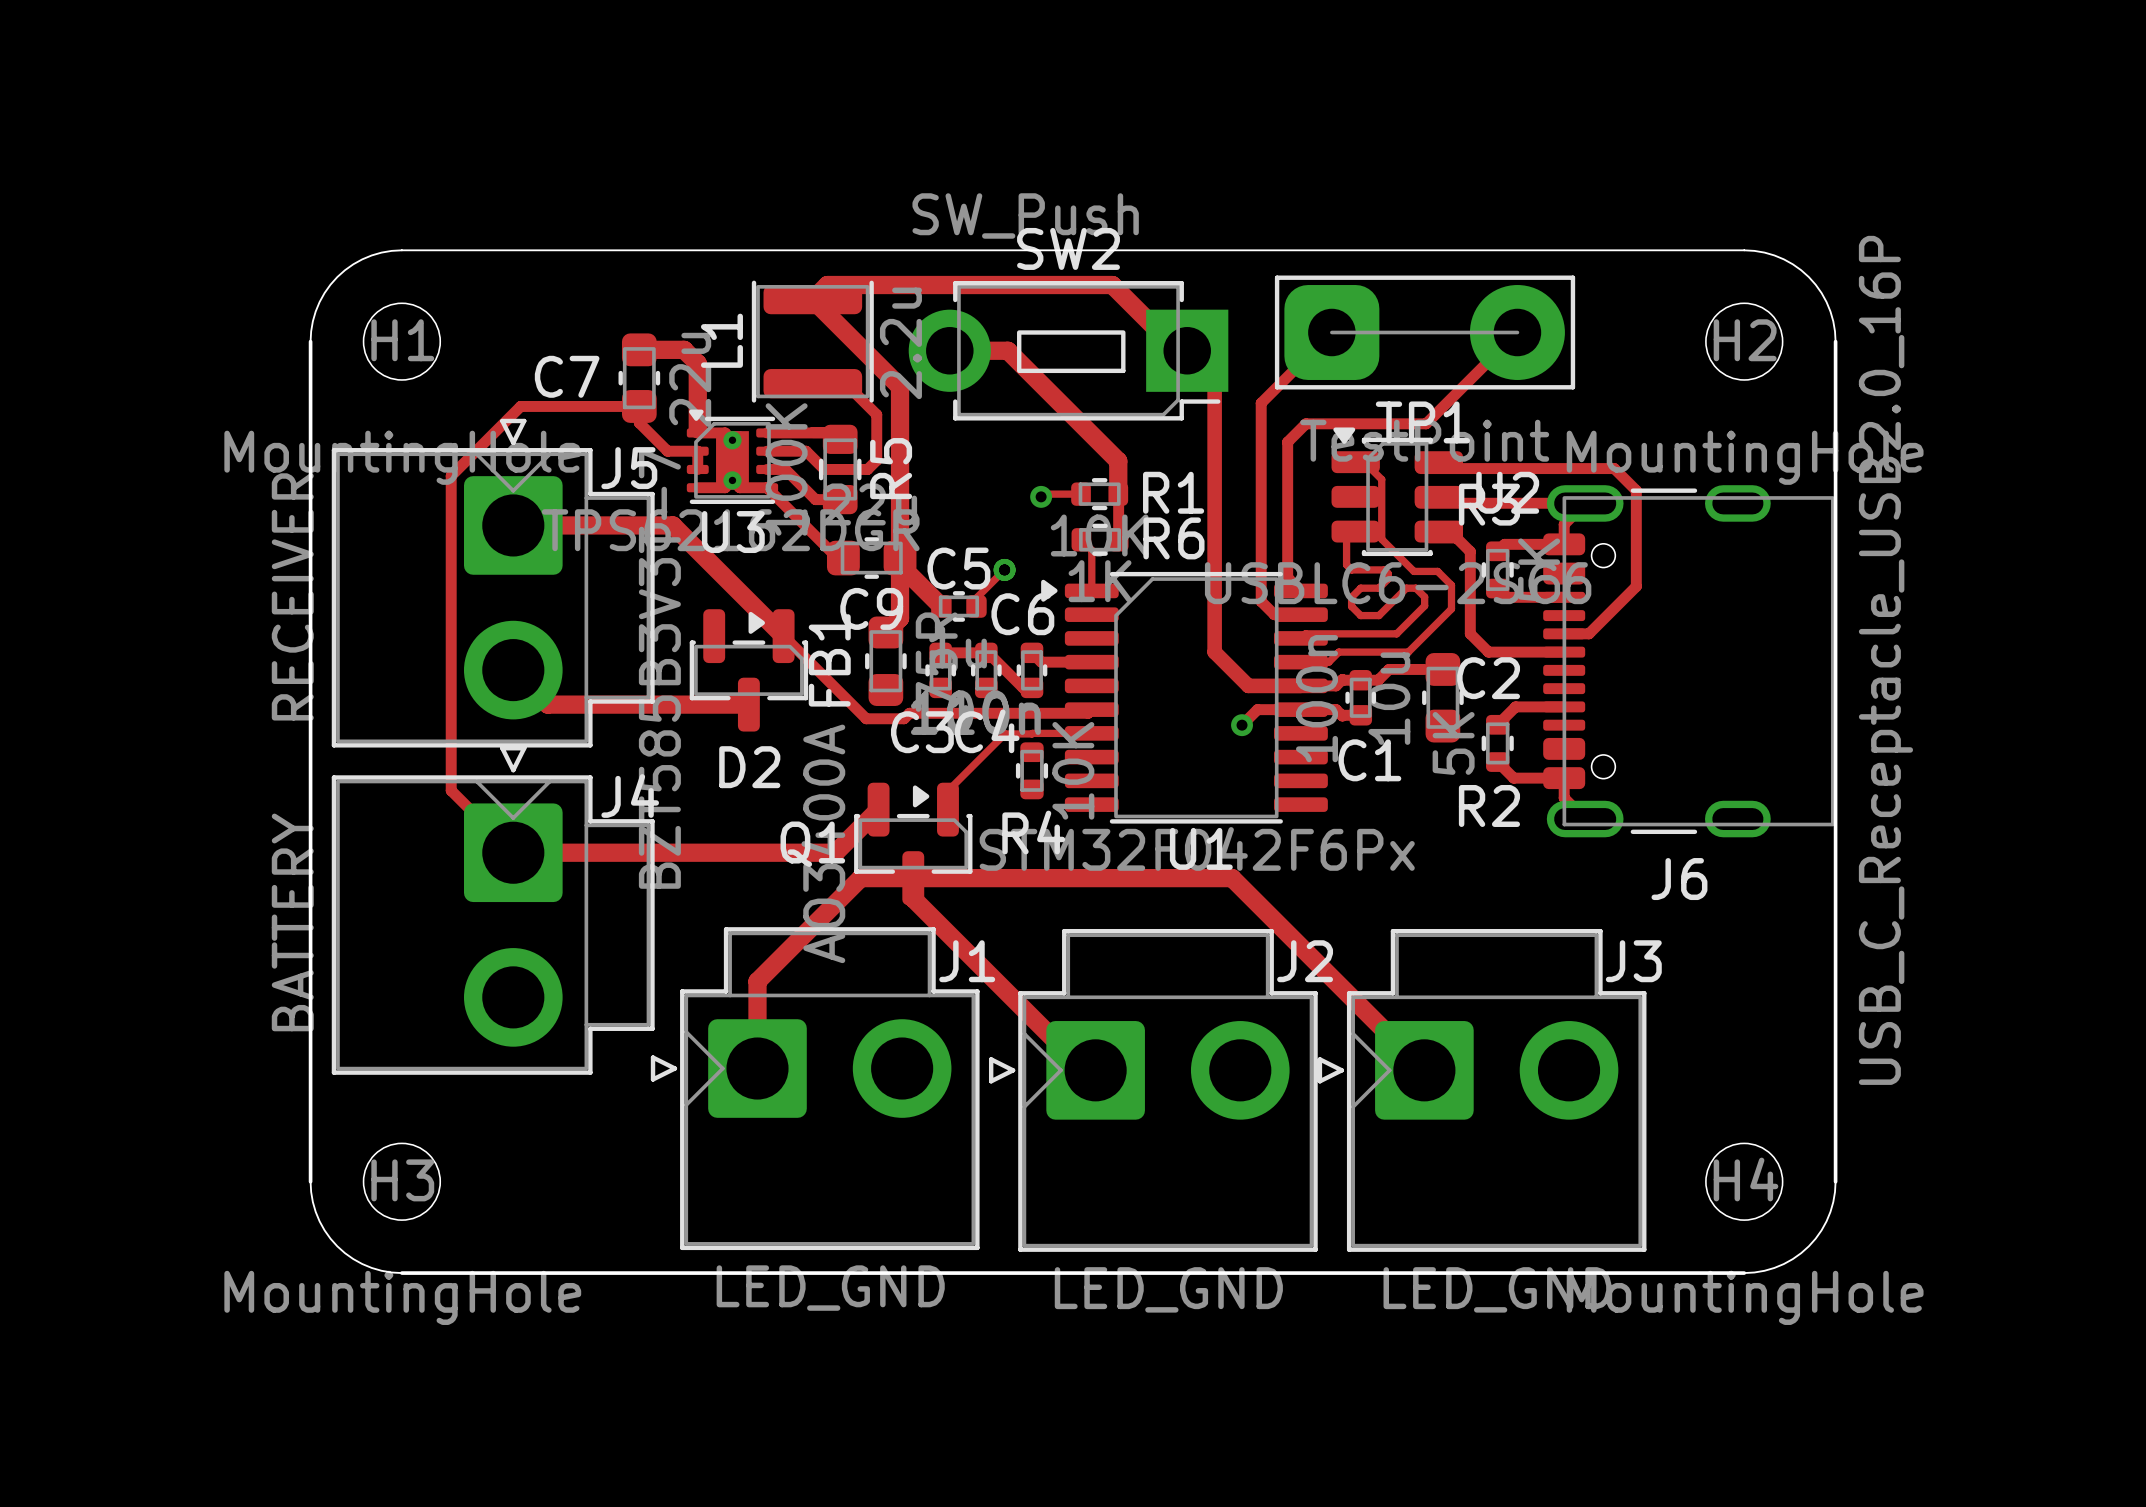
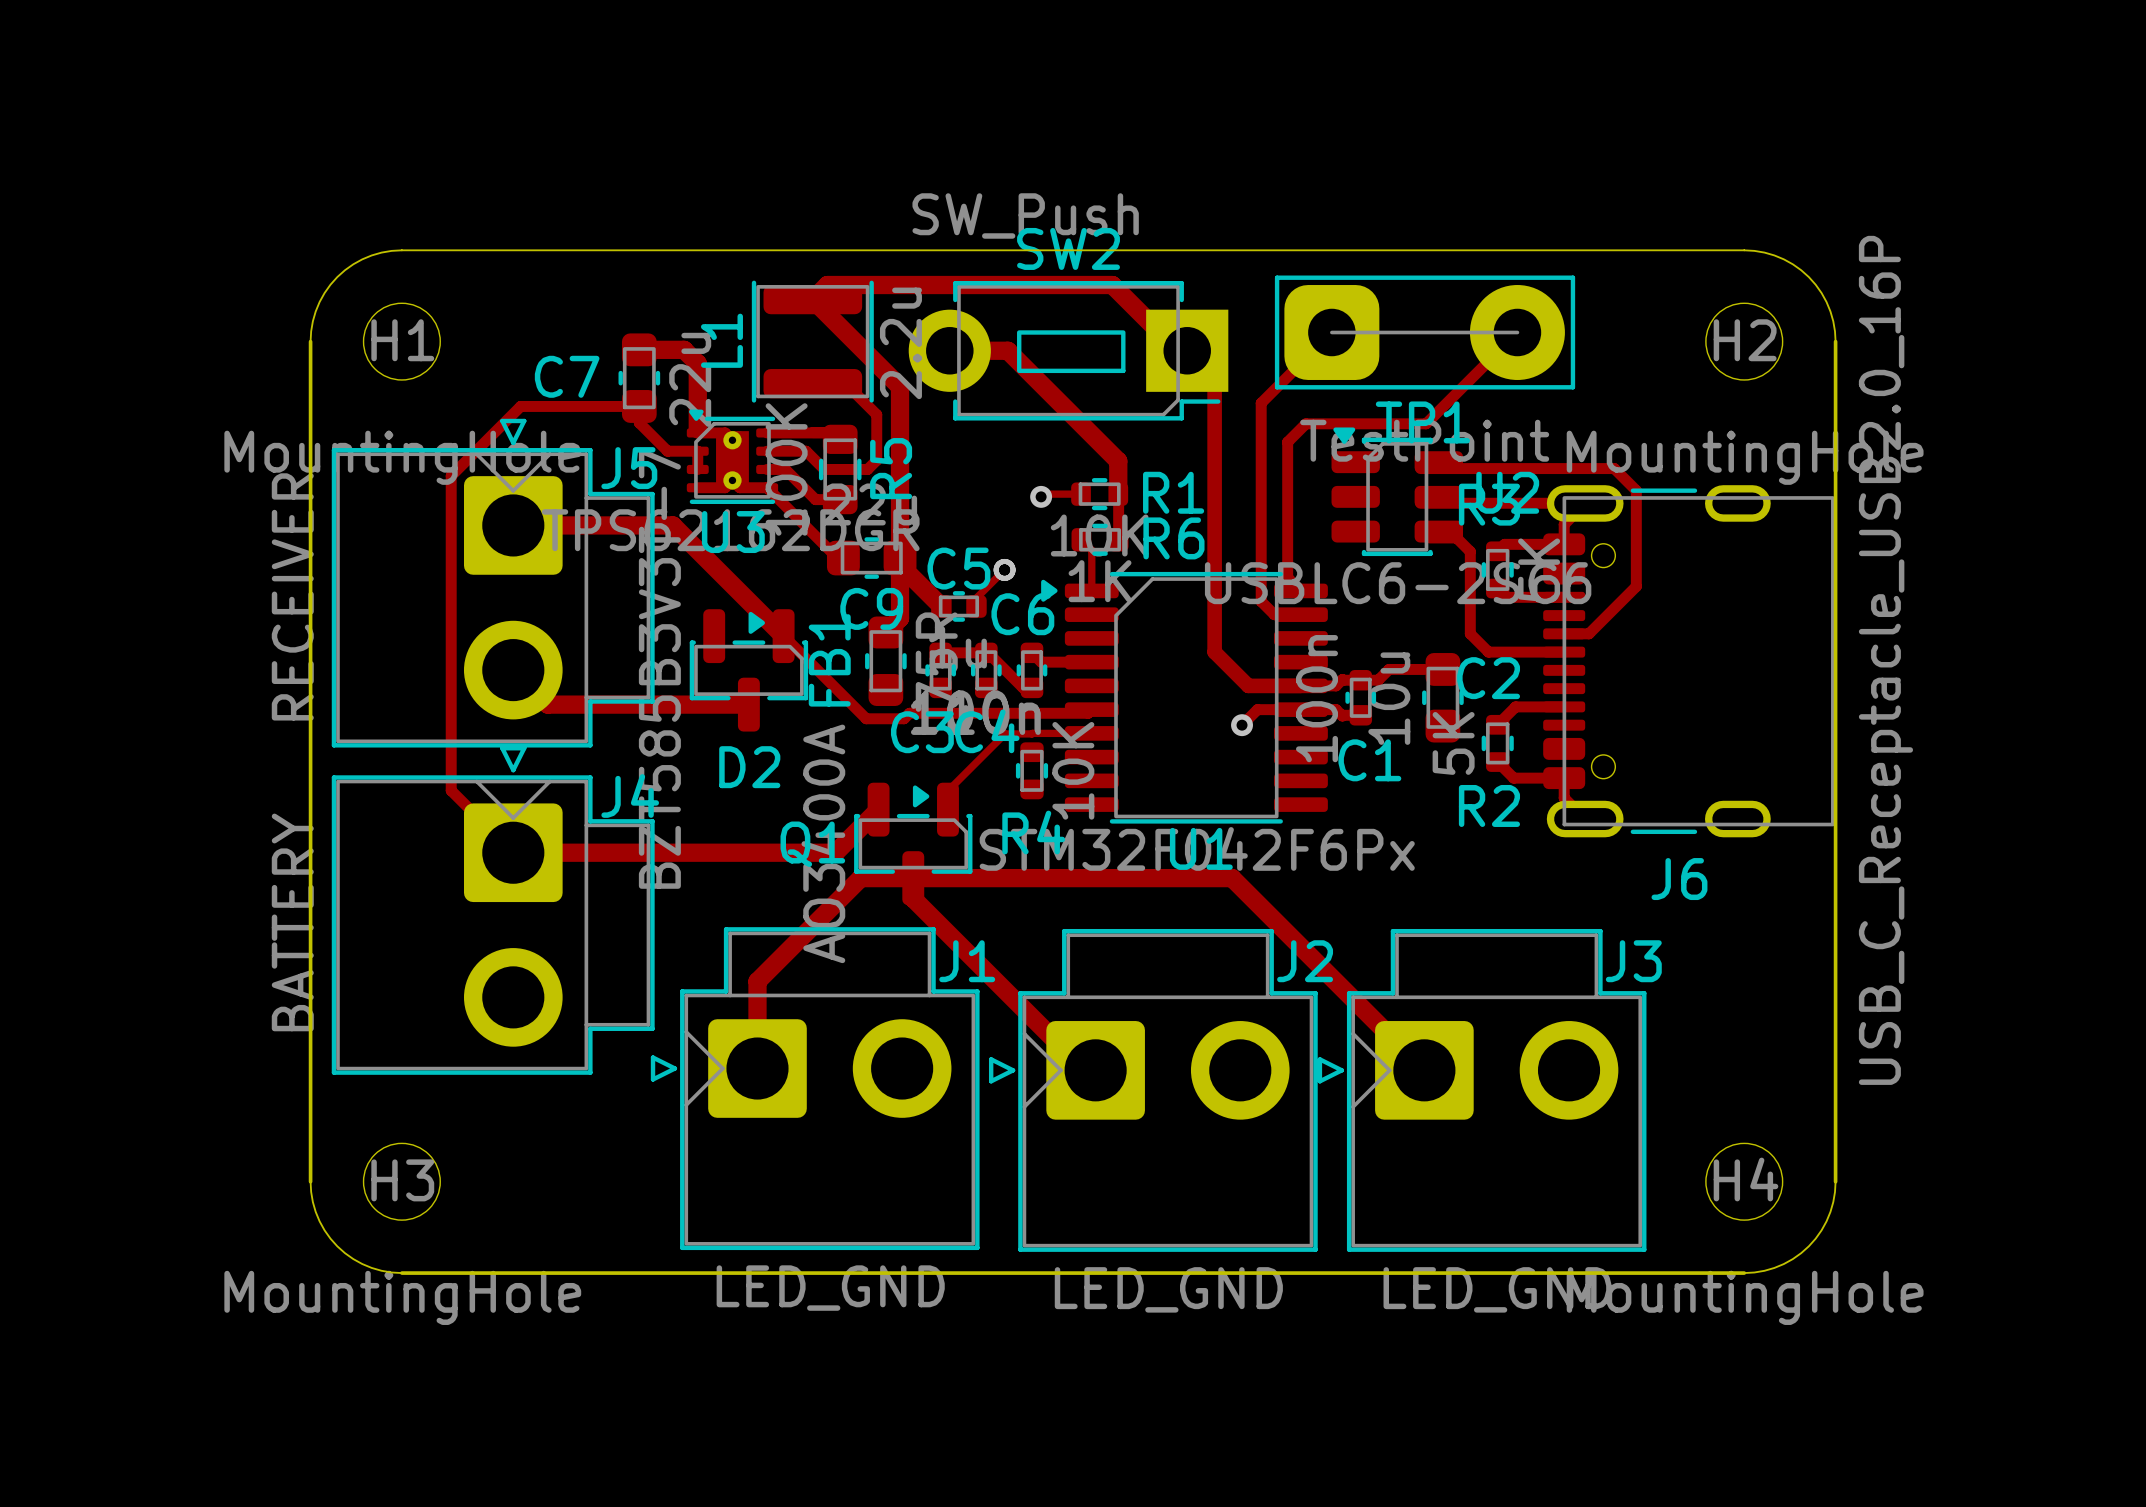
top track: (1346, 468) (1370, 468) (1381, 479) (1381, 539) (1413, 571) (1437, 571) (1451, 585) (1451, 608) (1408, 652) (1338, 652) (1328, 662) (1300, 662) -> none
top track: (1346, 537) (1346, 564) (1351, 569) (1384, 569) (1388, 573) (1388, 579) (1378, 588) (1360, 588) (1351, 597) (1351, 606) (1360, 615) (1378, 615) (1406, 588) (1415, 588) (1424, 596) (1424, 605) (1396, 633) (1305, 633) (1300, 638) -> none

